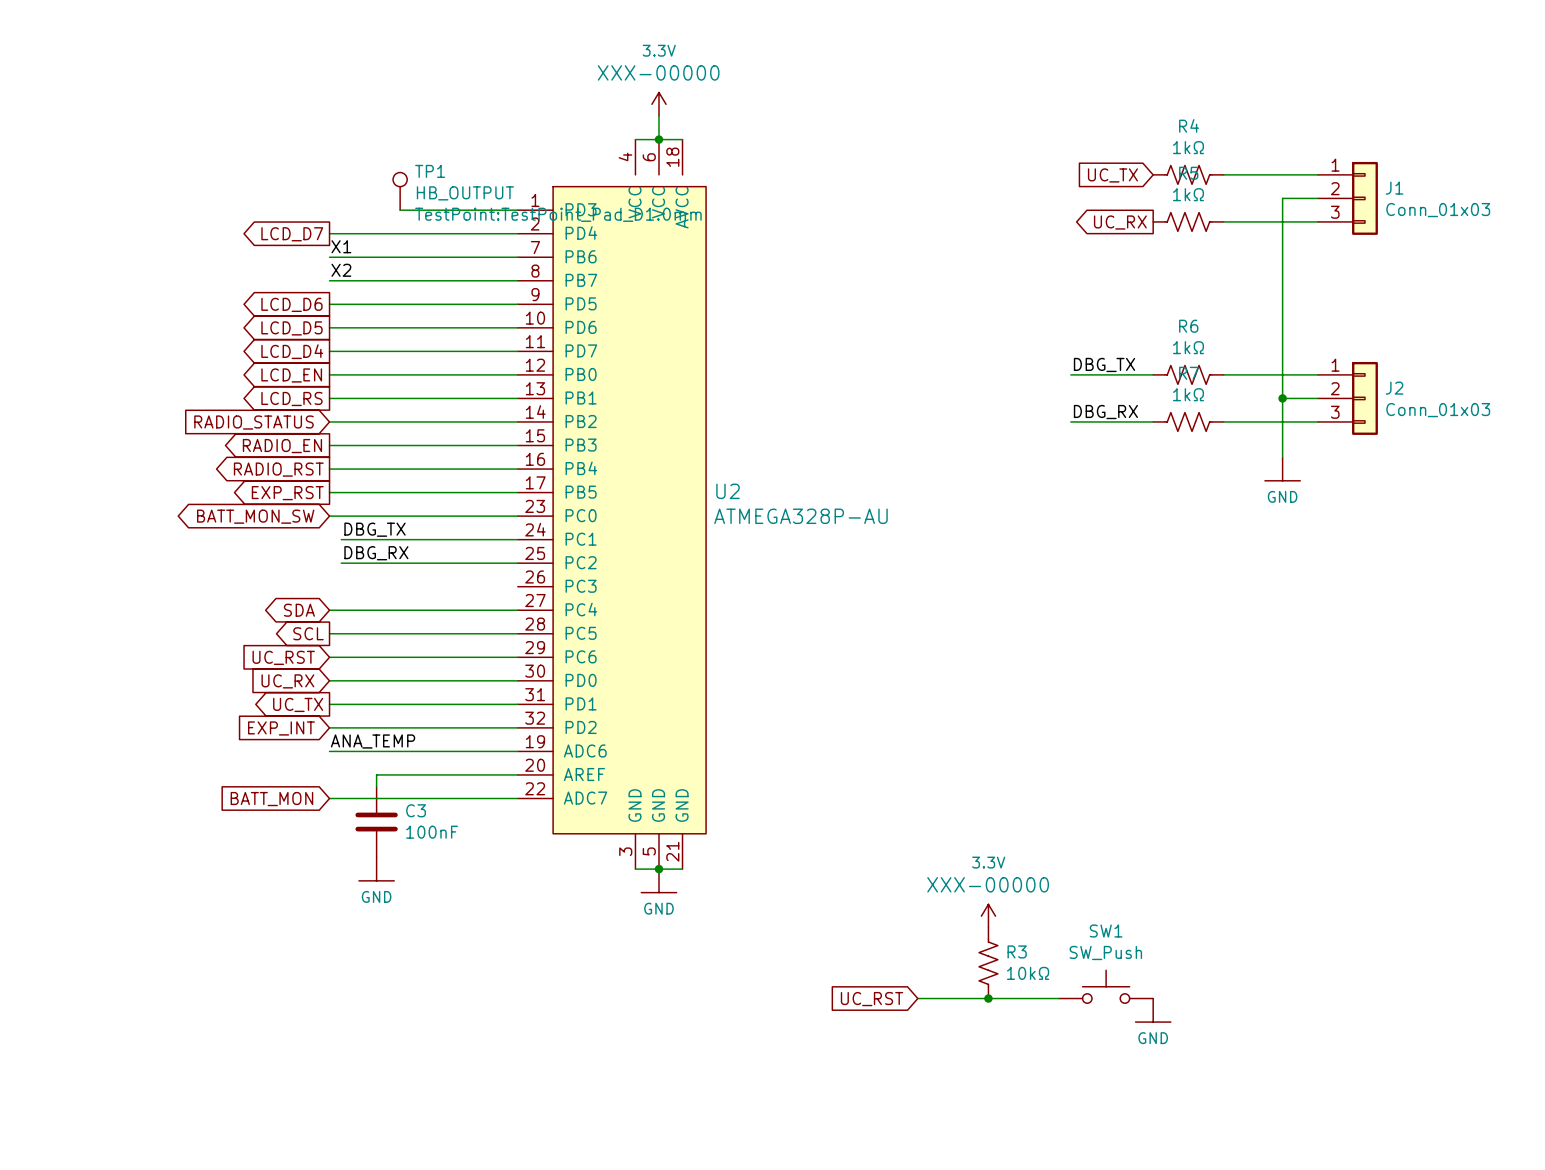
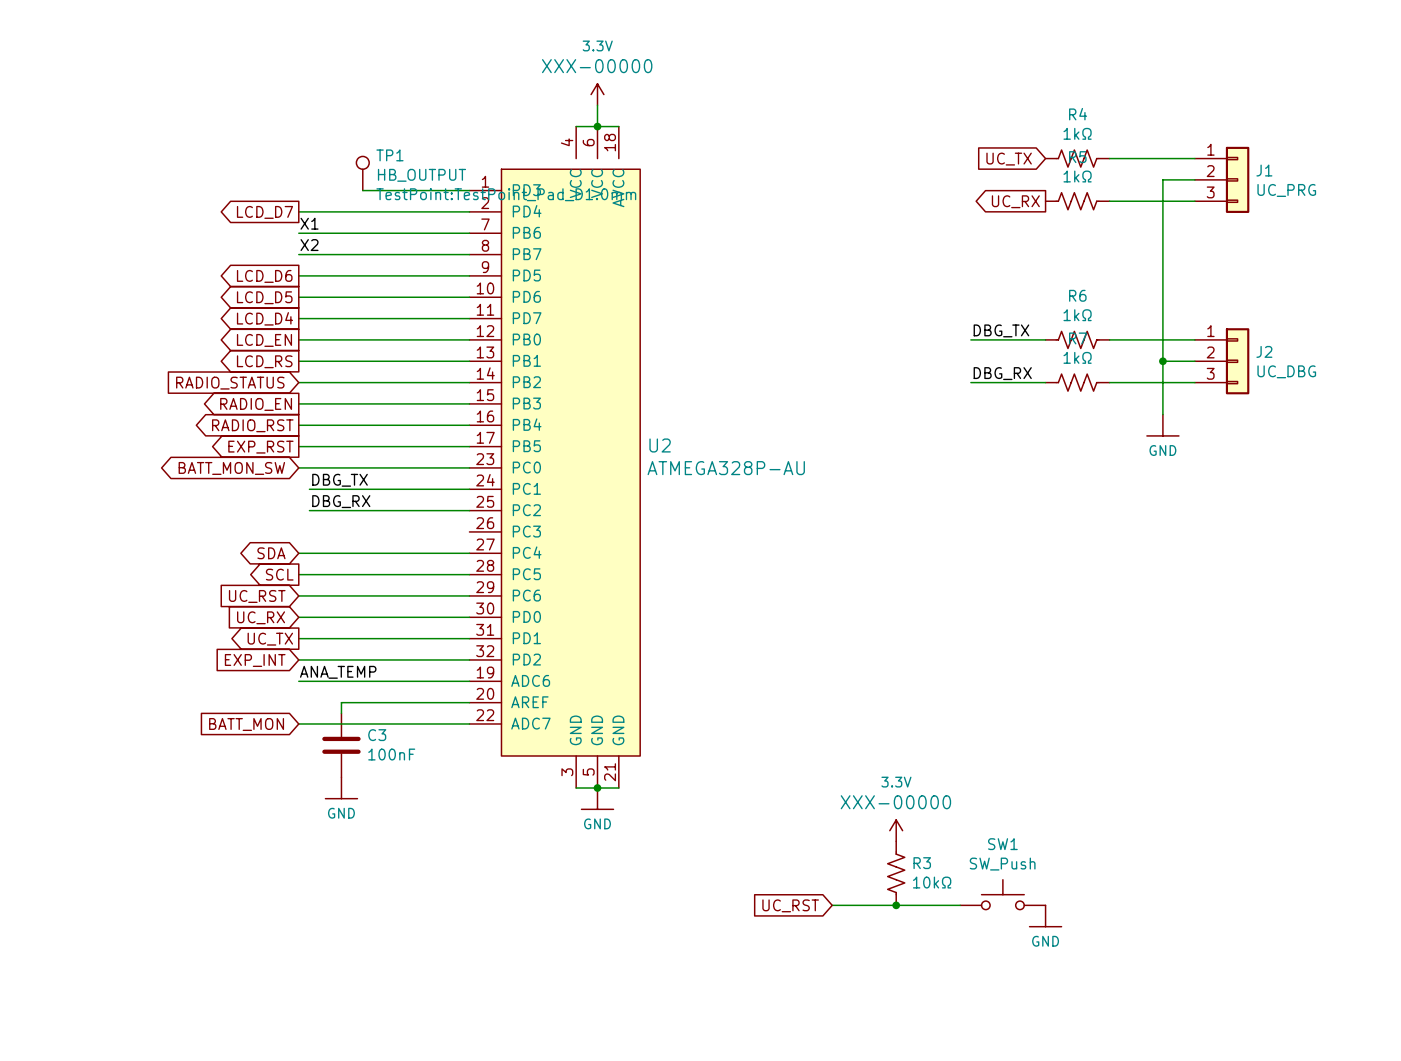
J1 value: Conn_01x03 (1438, 210) -> UC_PRG (1286, 190)
J2 value: Conn_01x03 (1438, 410) -> UC_DBG (1286, 371)

